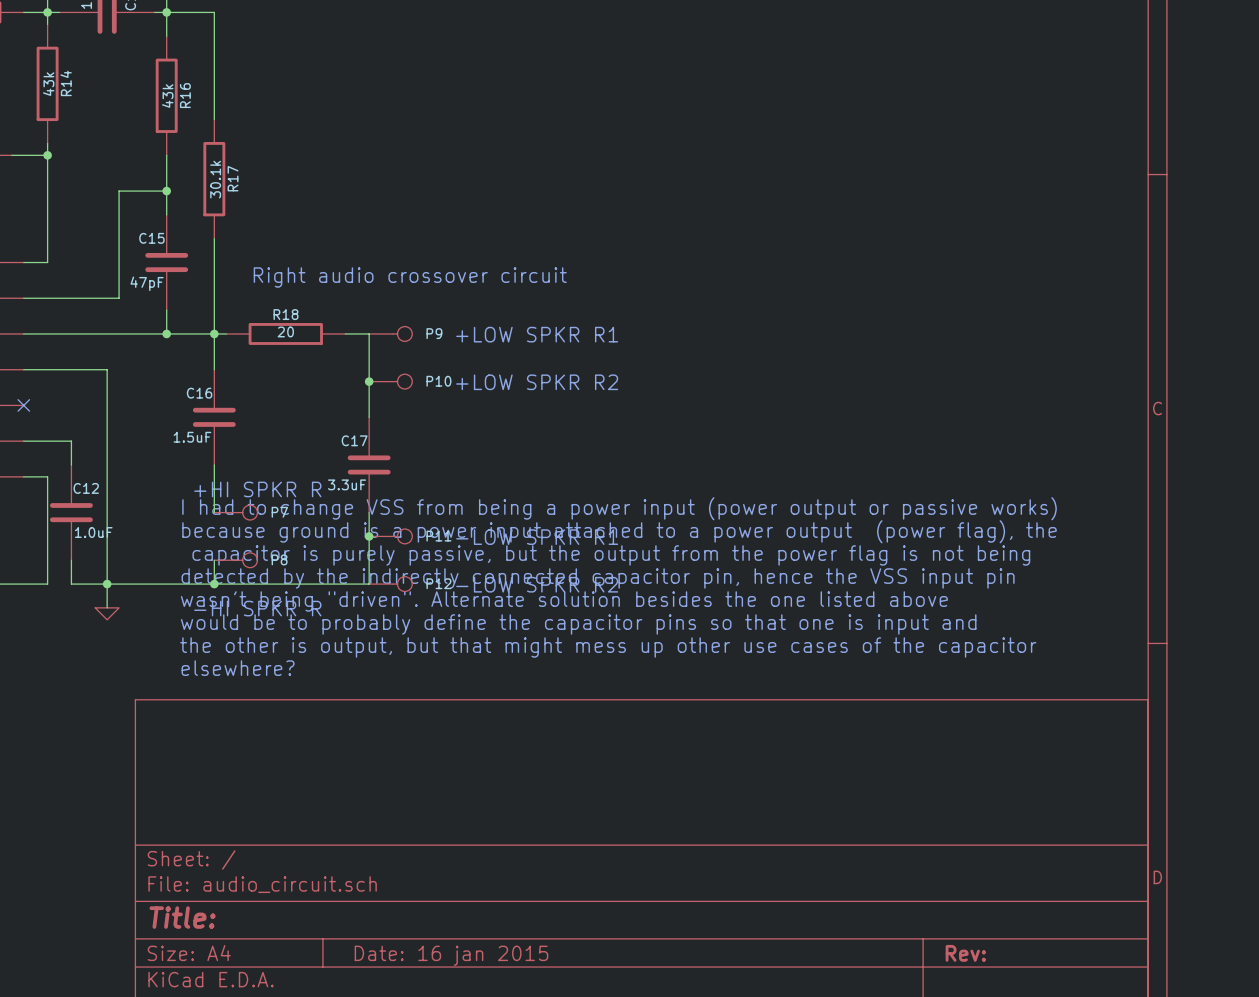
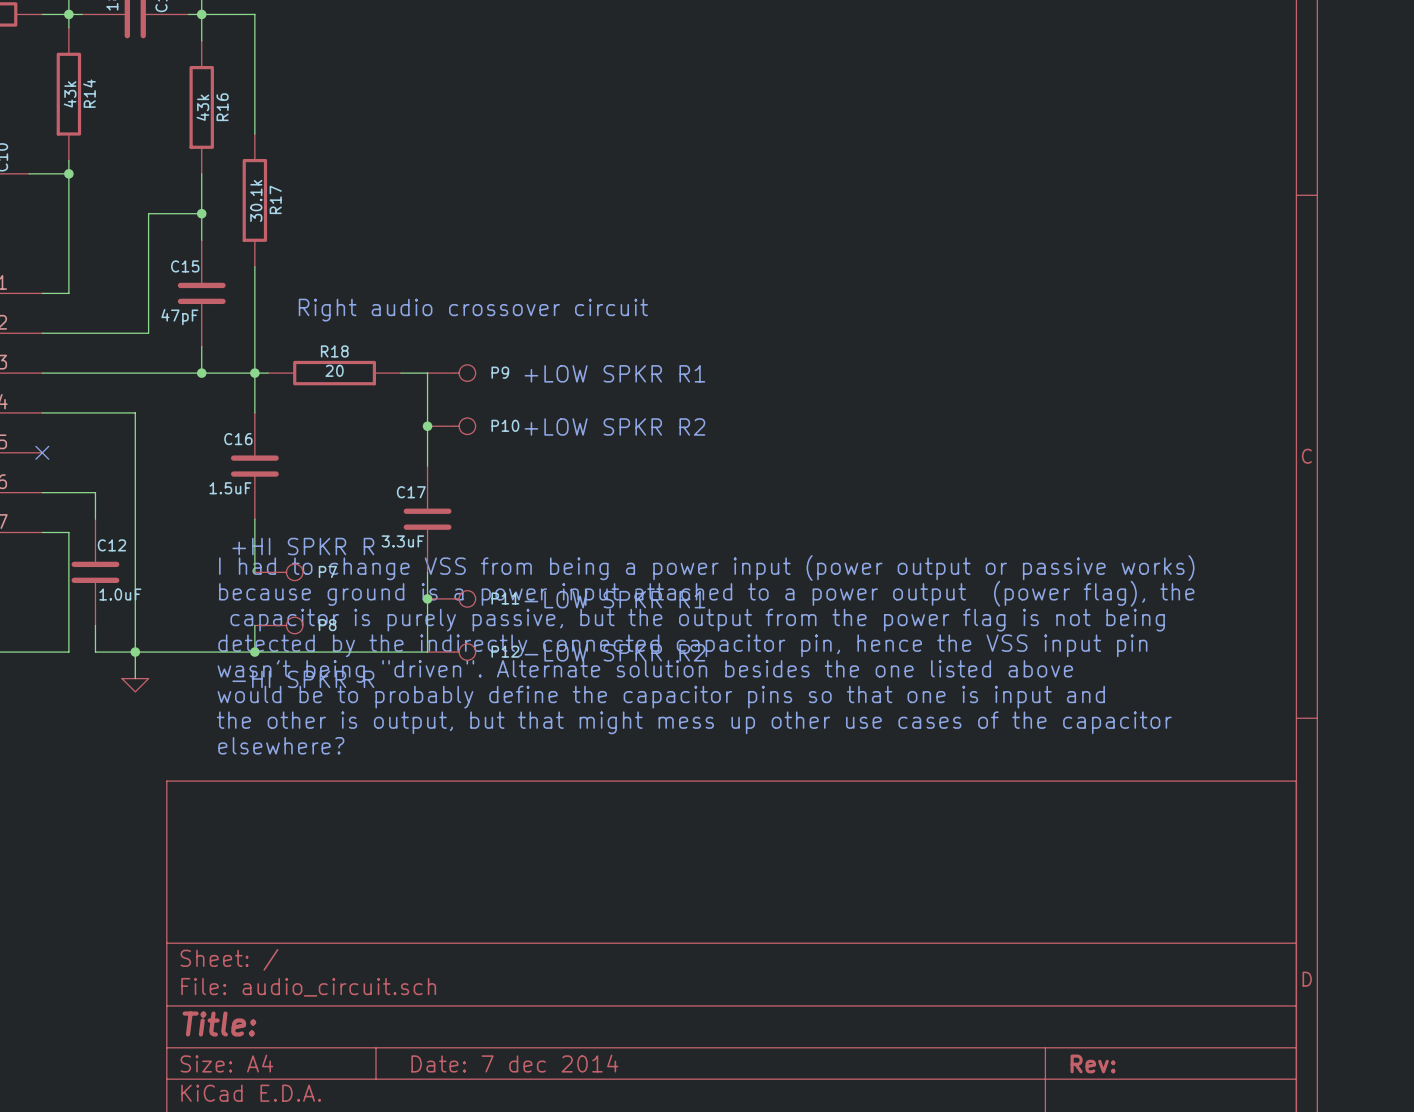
title block: Date: 16 jan 2015 (451, 955) -> Date: 7 dec 2014 (514, 1063)

